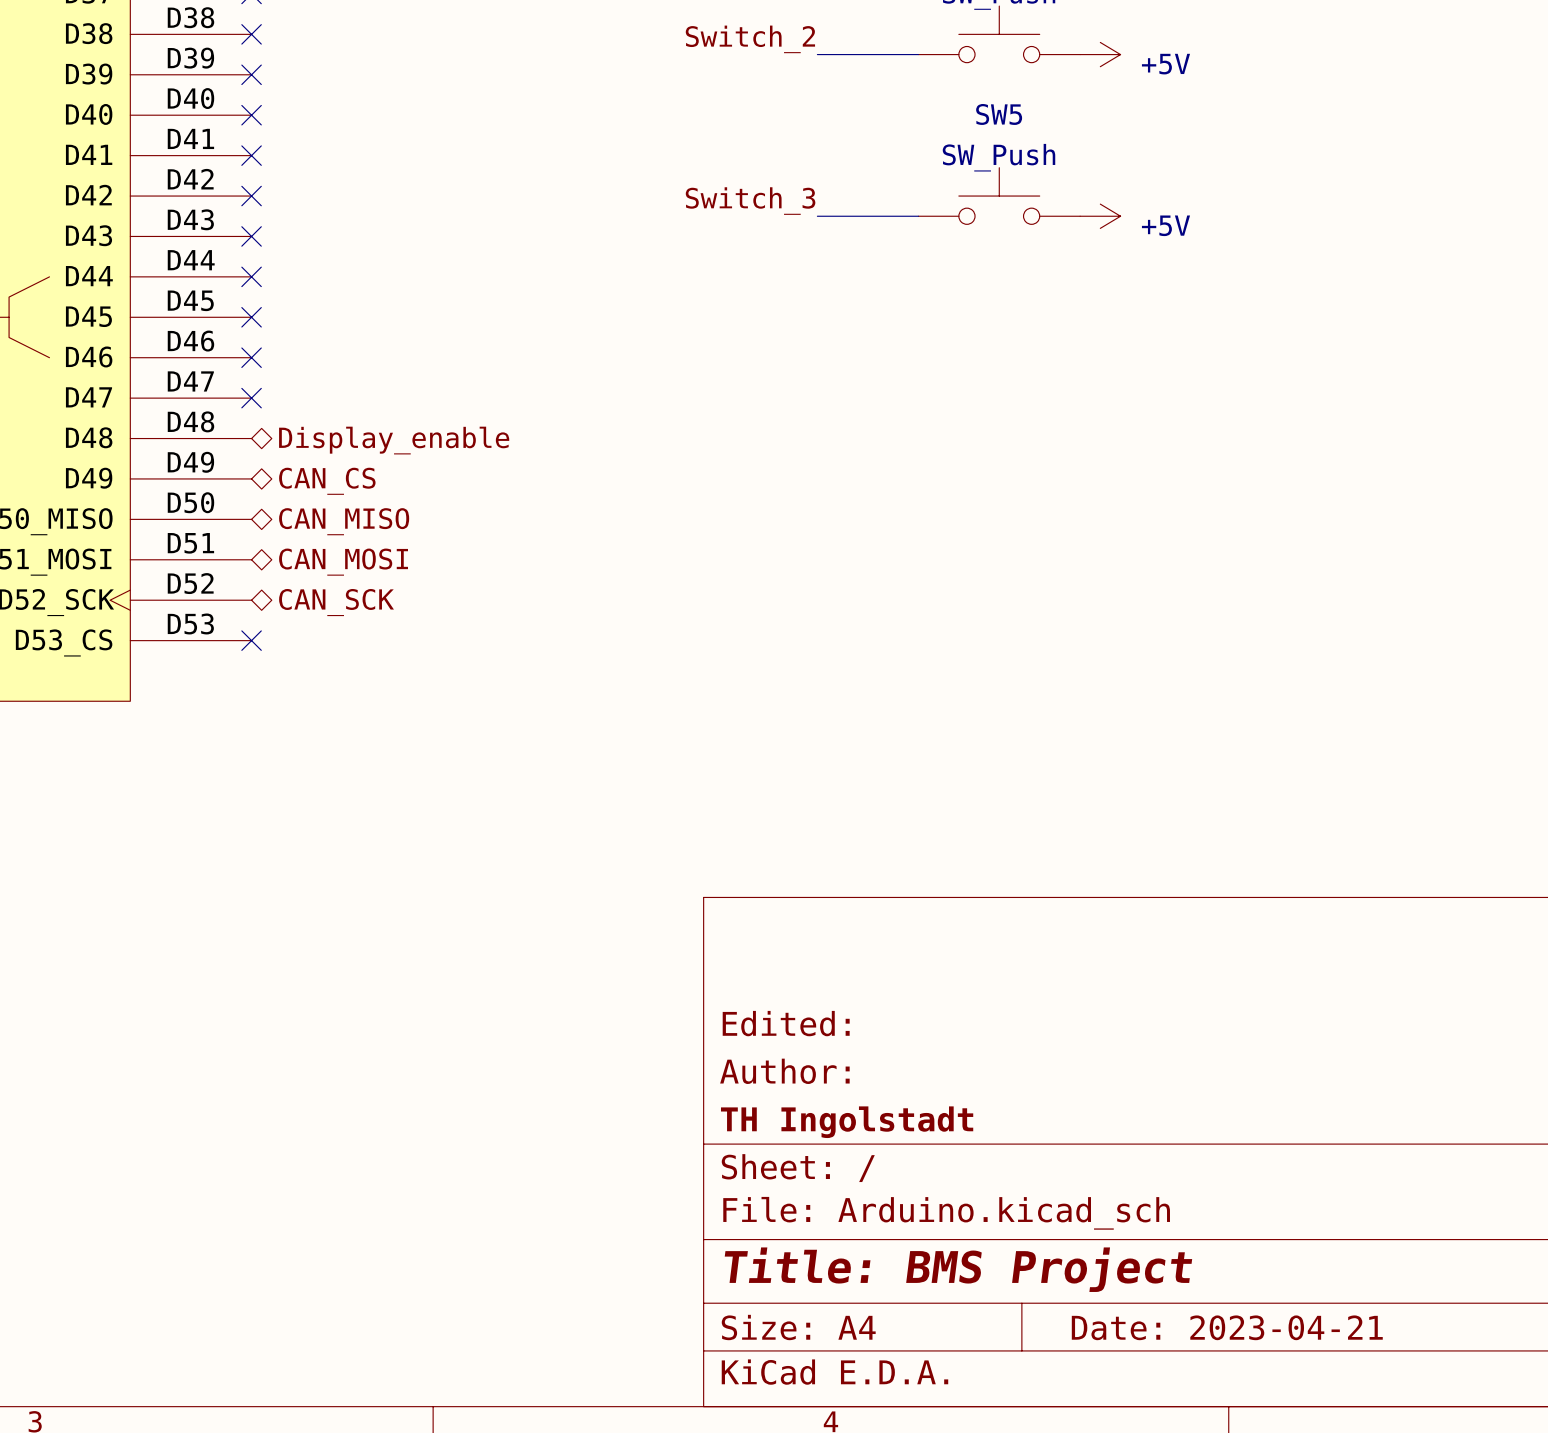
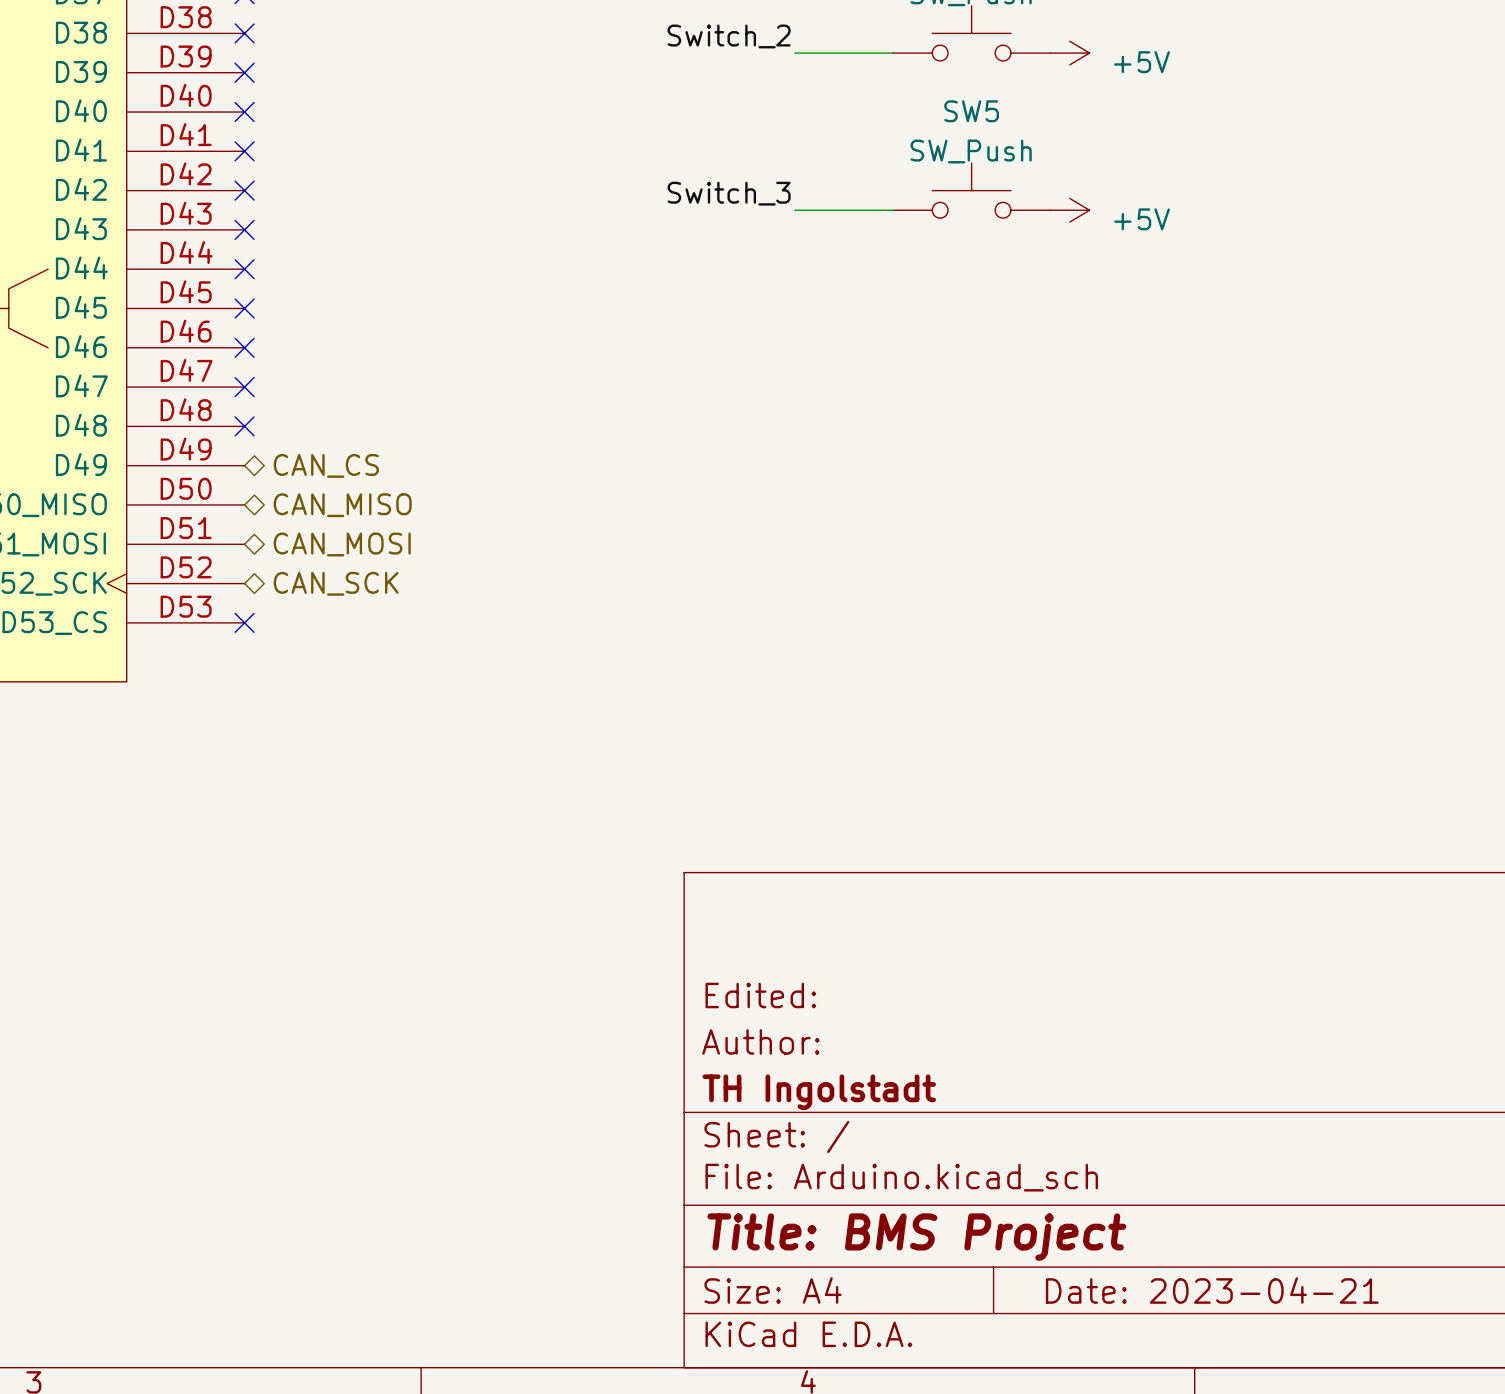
no-connect mark: none -> (244, 426)
hierarchical label: Display_enable (394, 440) -> none

